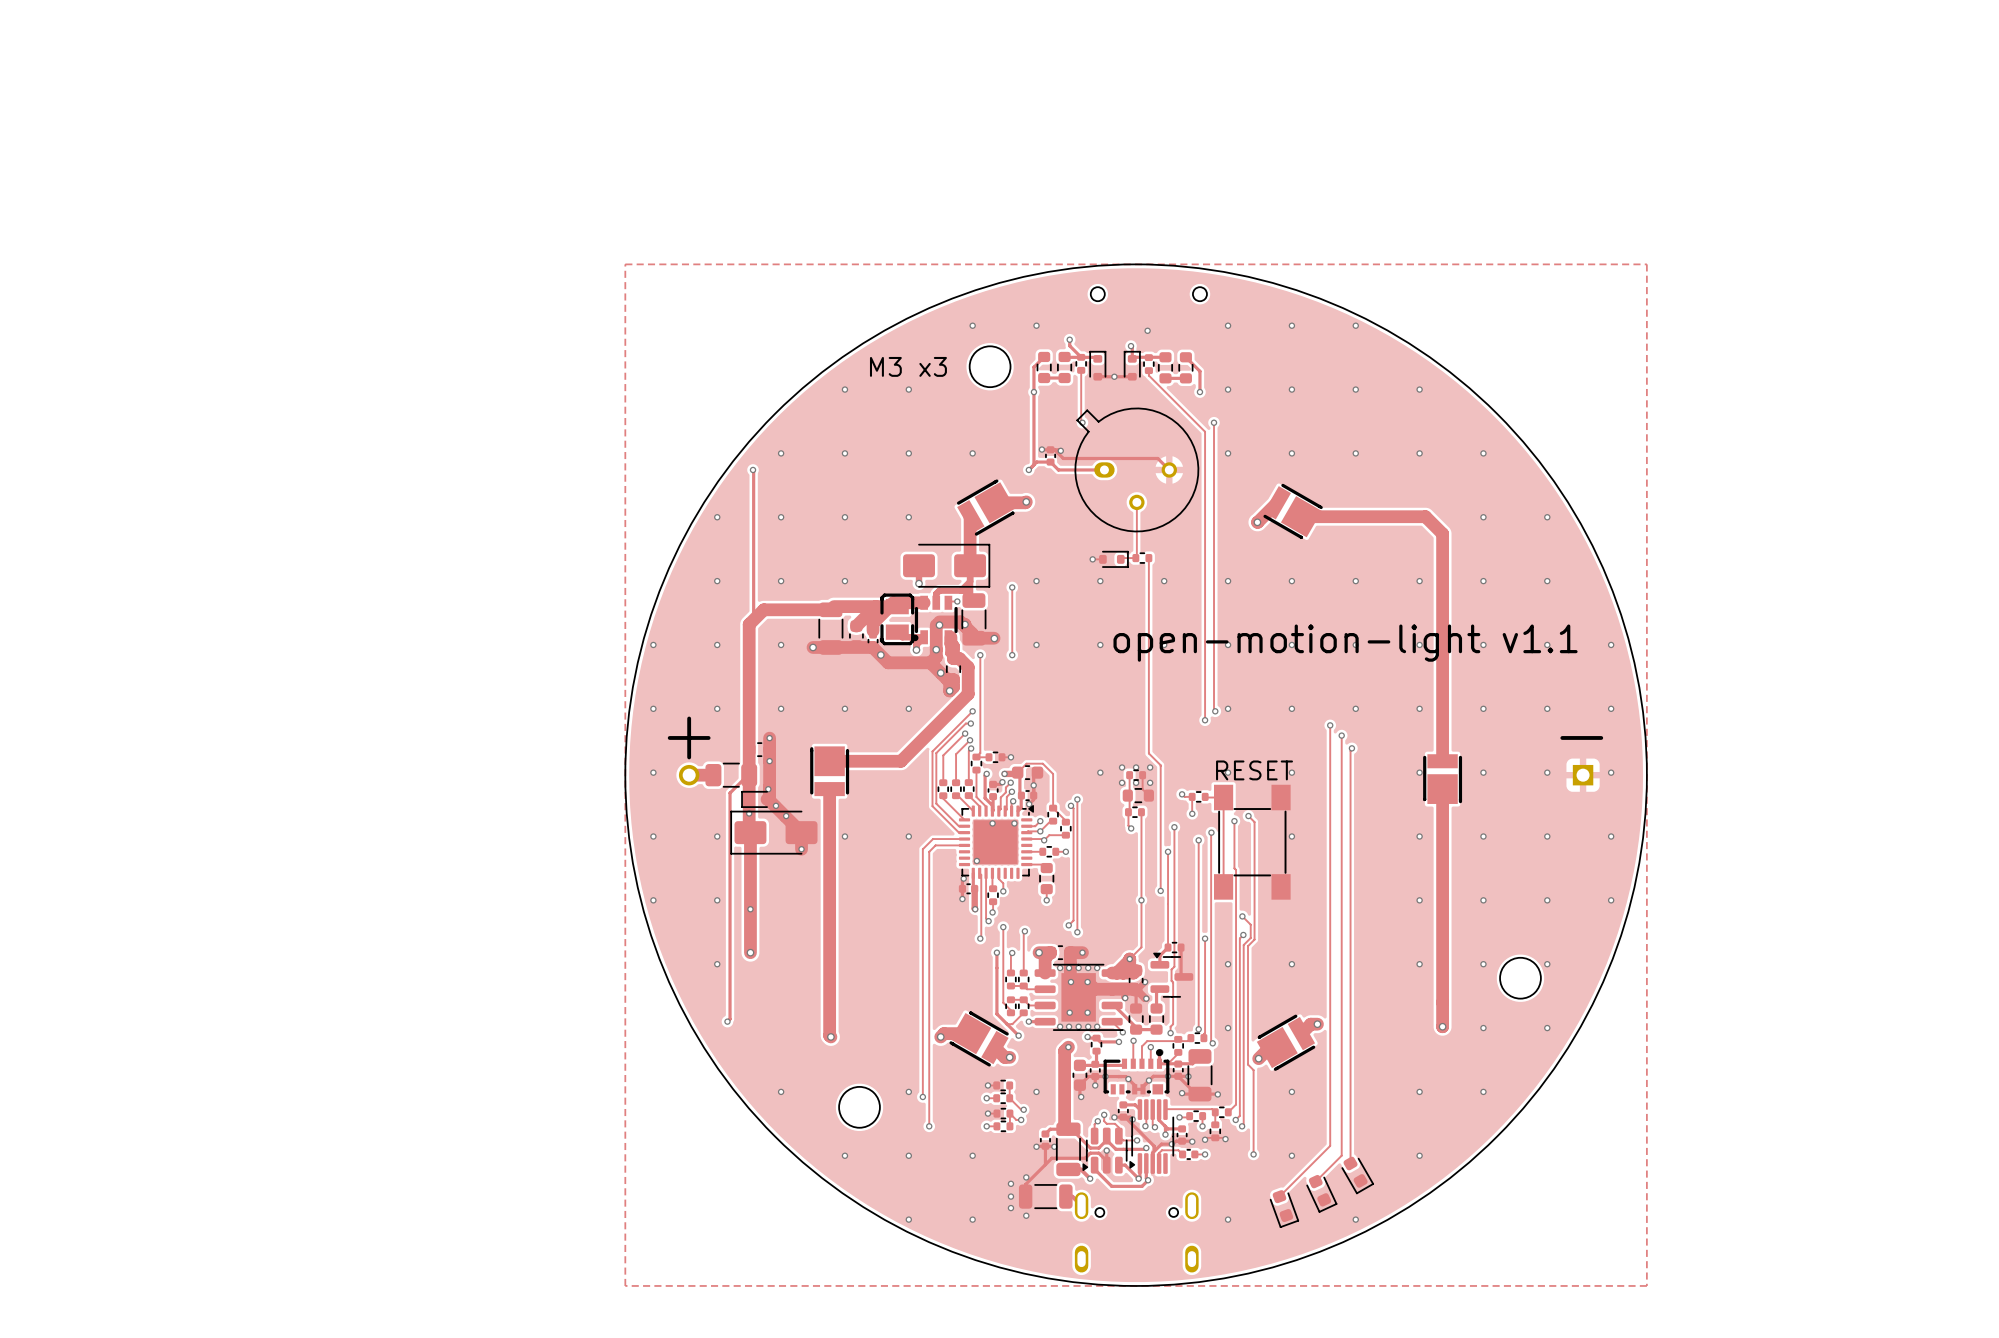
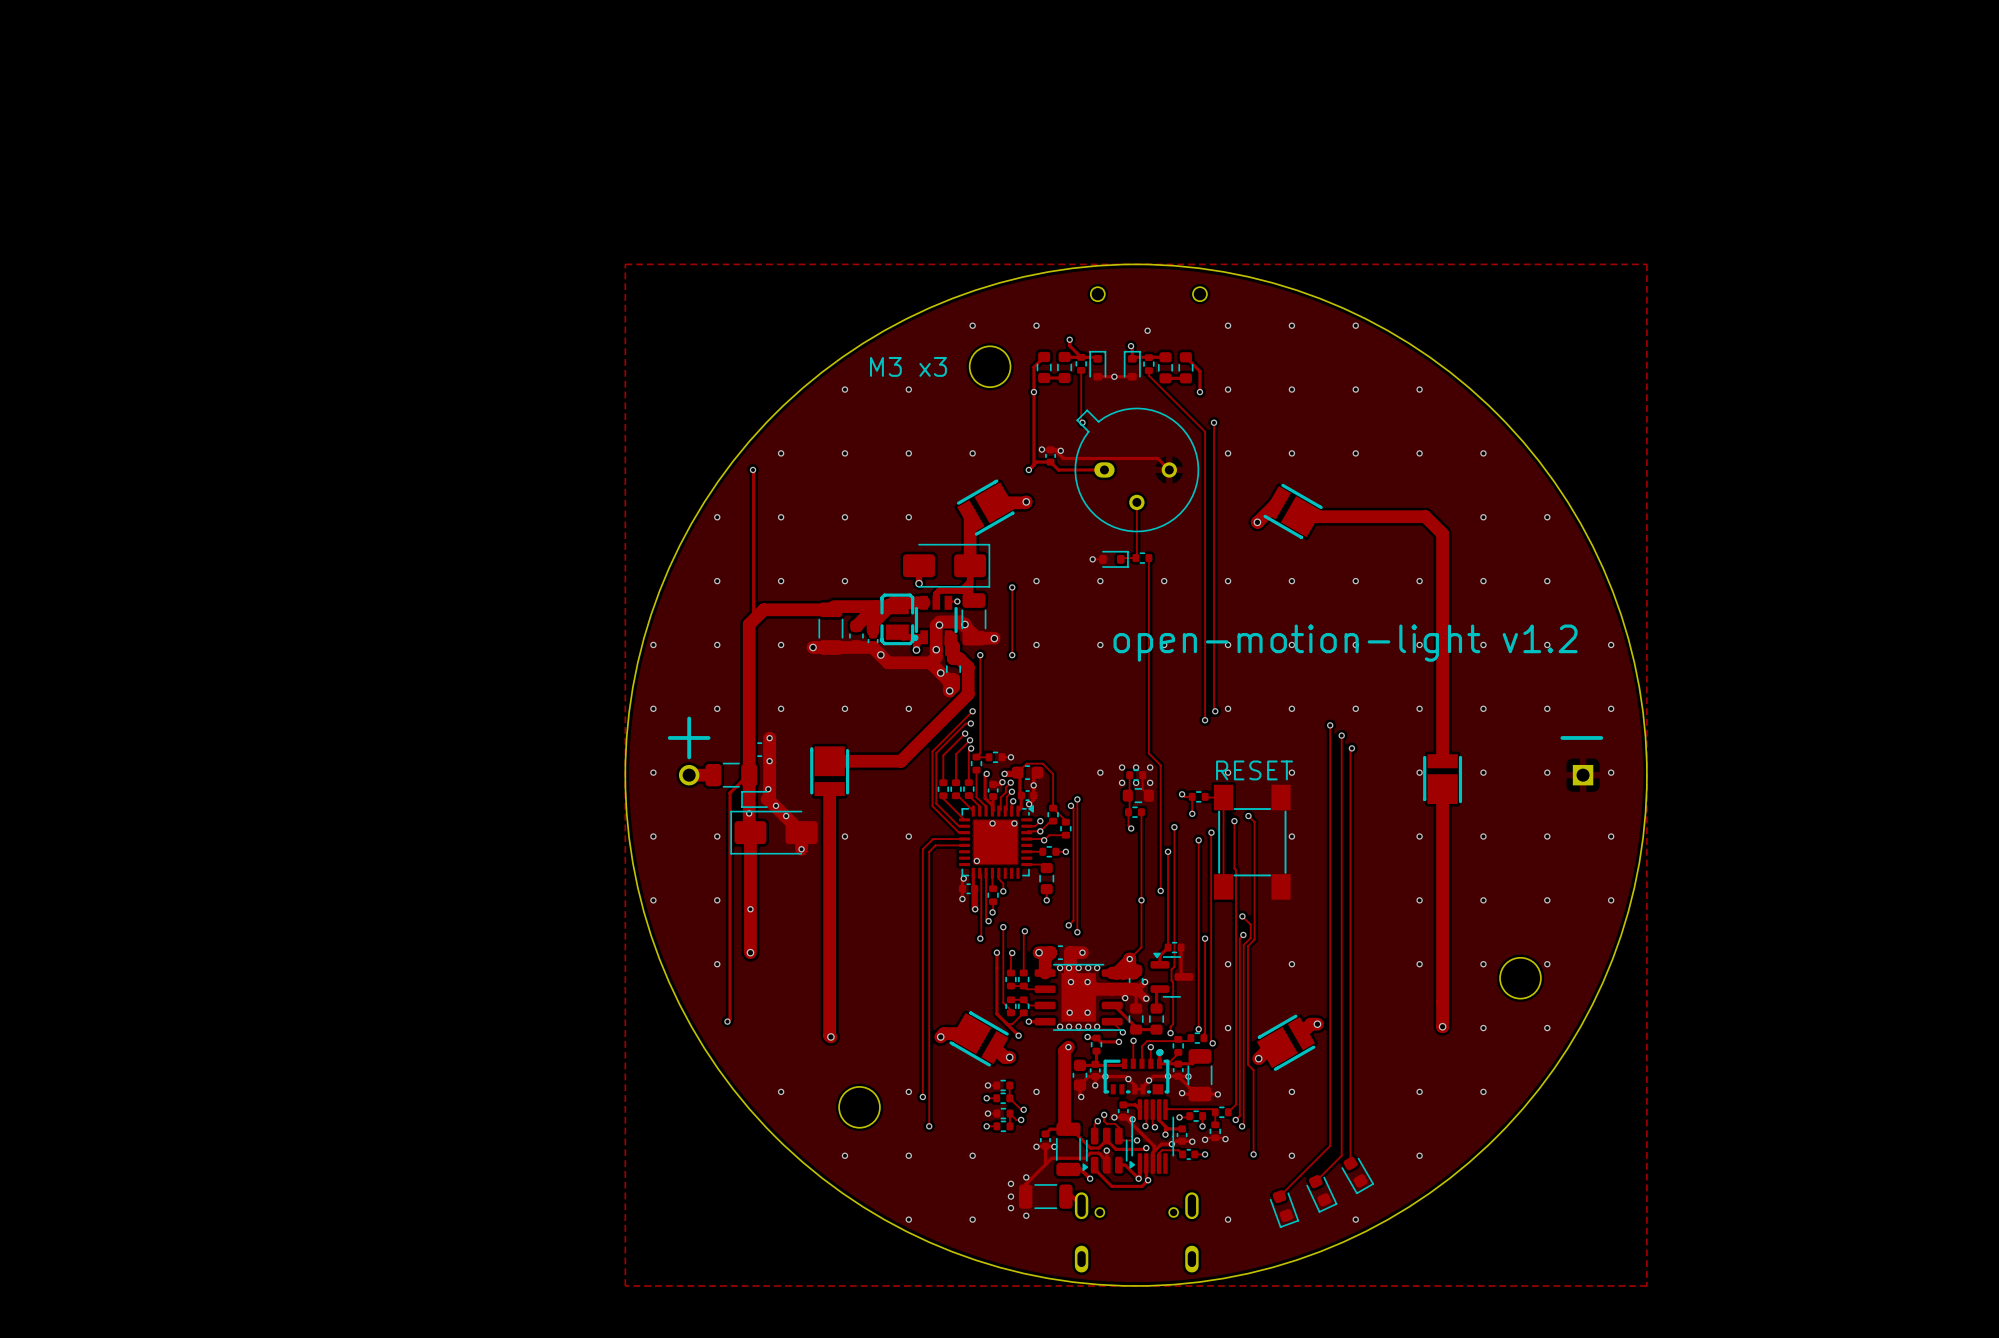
text: open-motion-light v1.1 (1345, 643) -> open-motion-light v1.2 (1345, 643)

